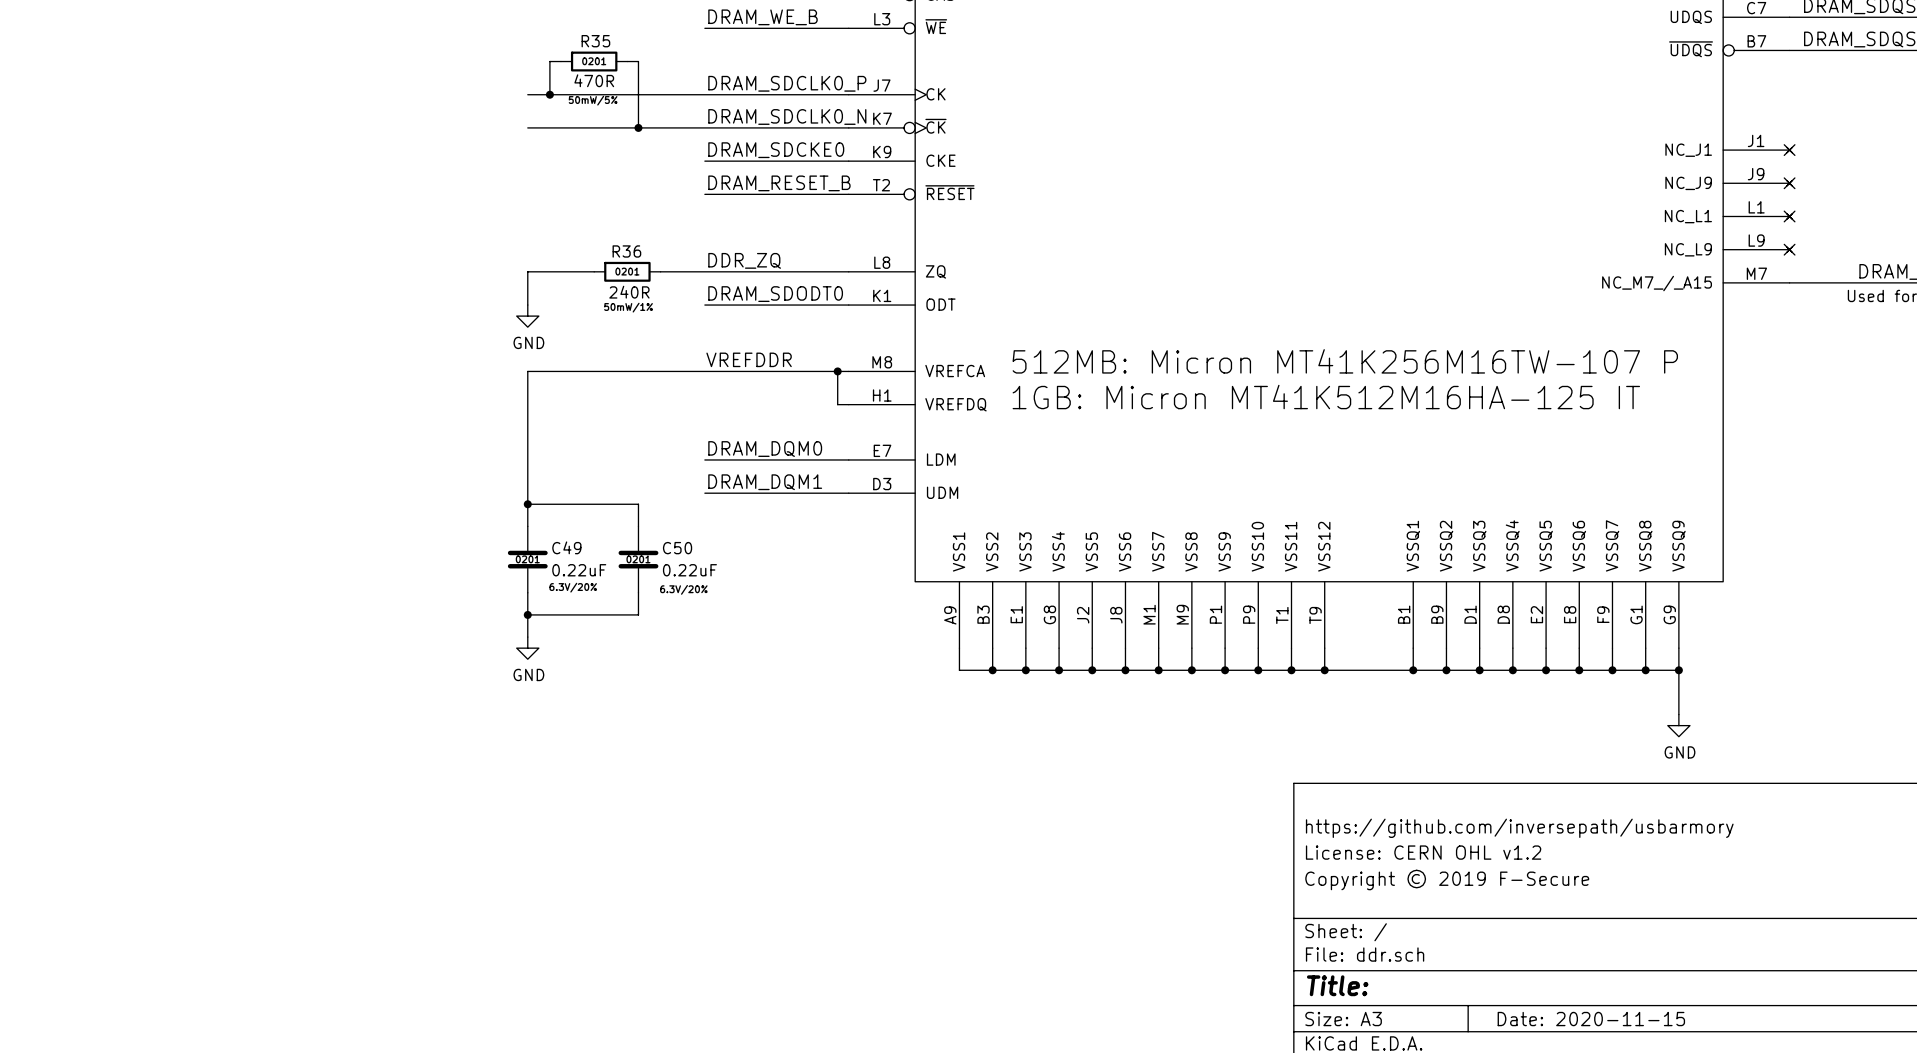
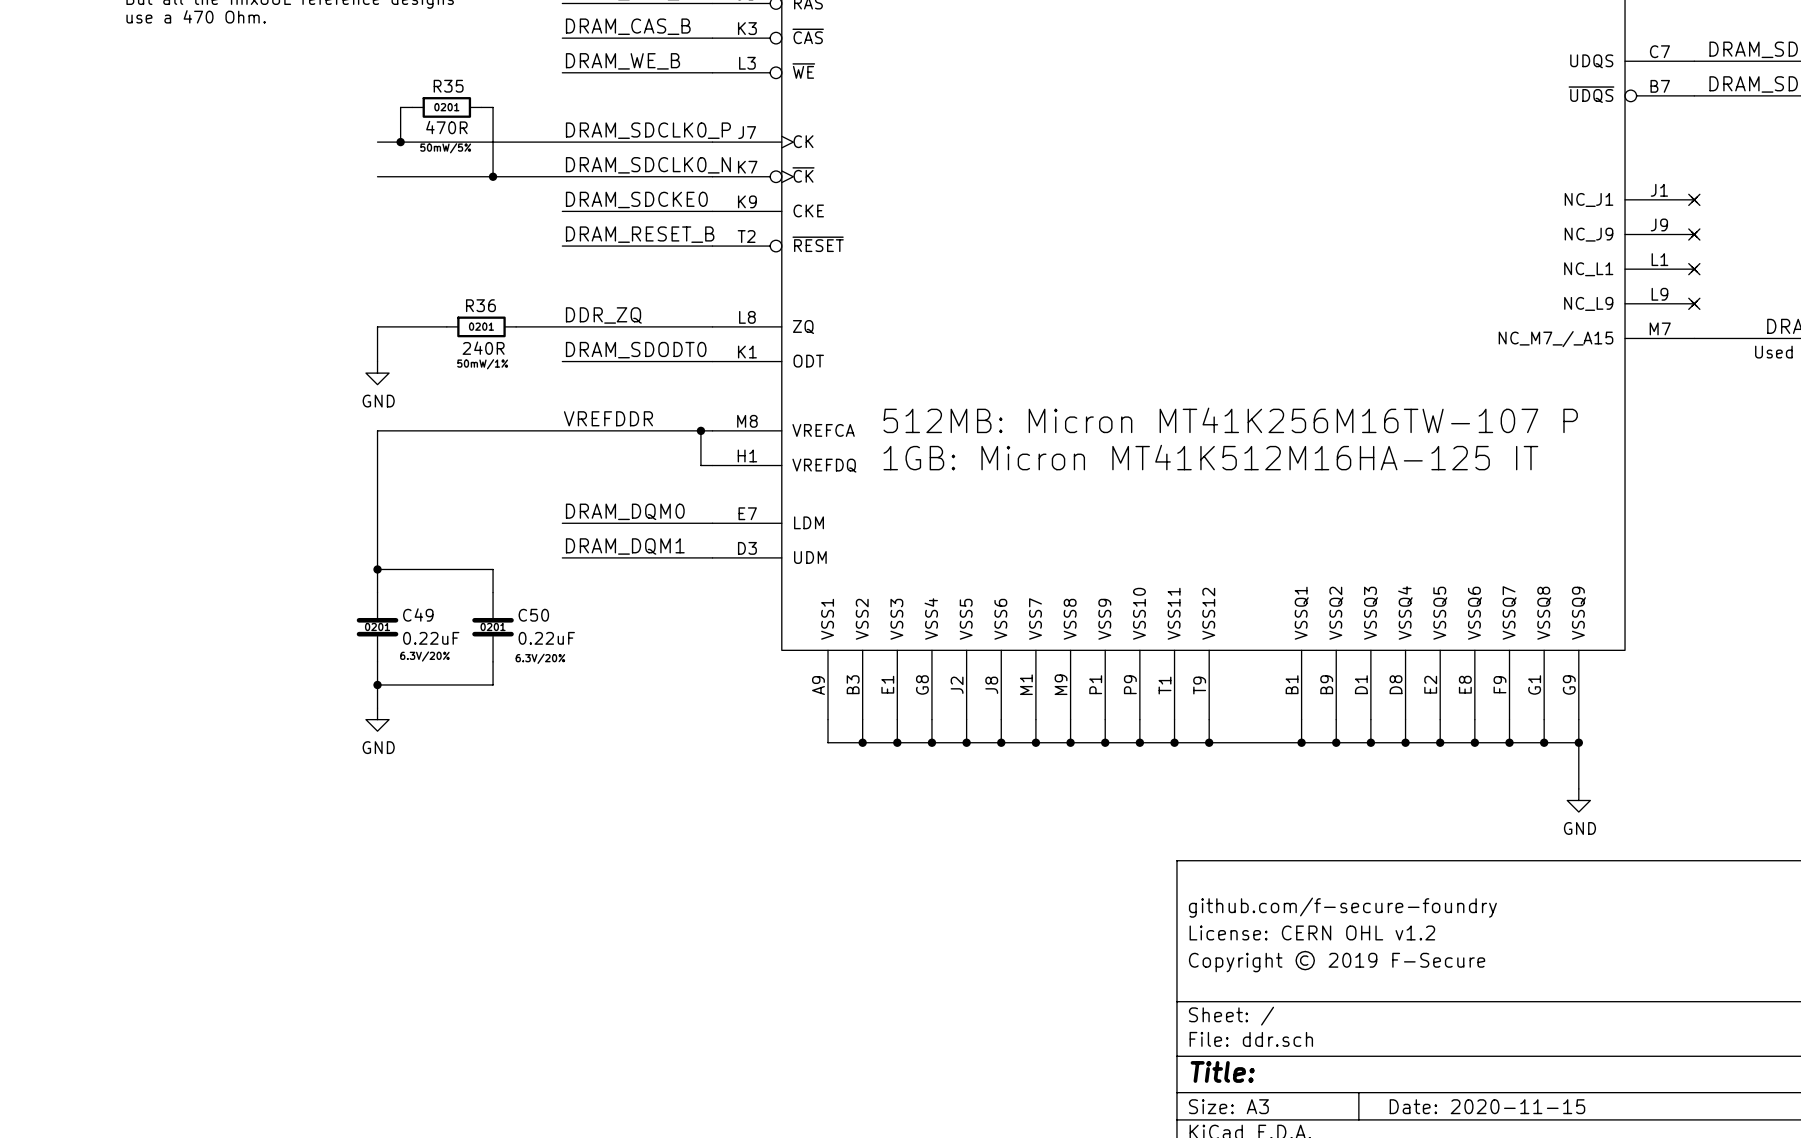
title block: https://github.com/inversepath/usbarmory (1519, 828) -> github.com/f-secure-foundry (1342, 907)

